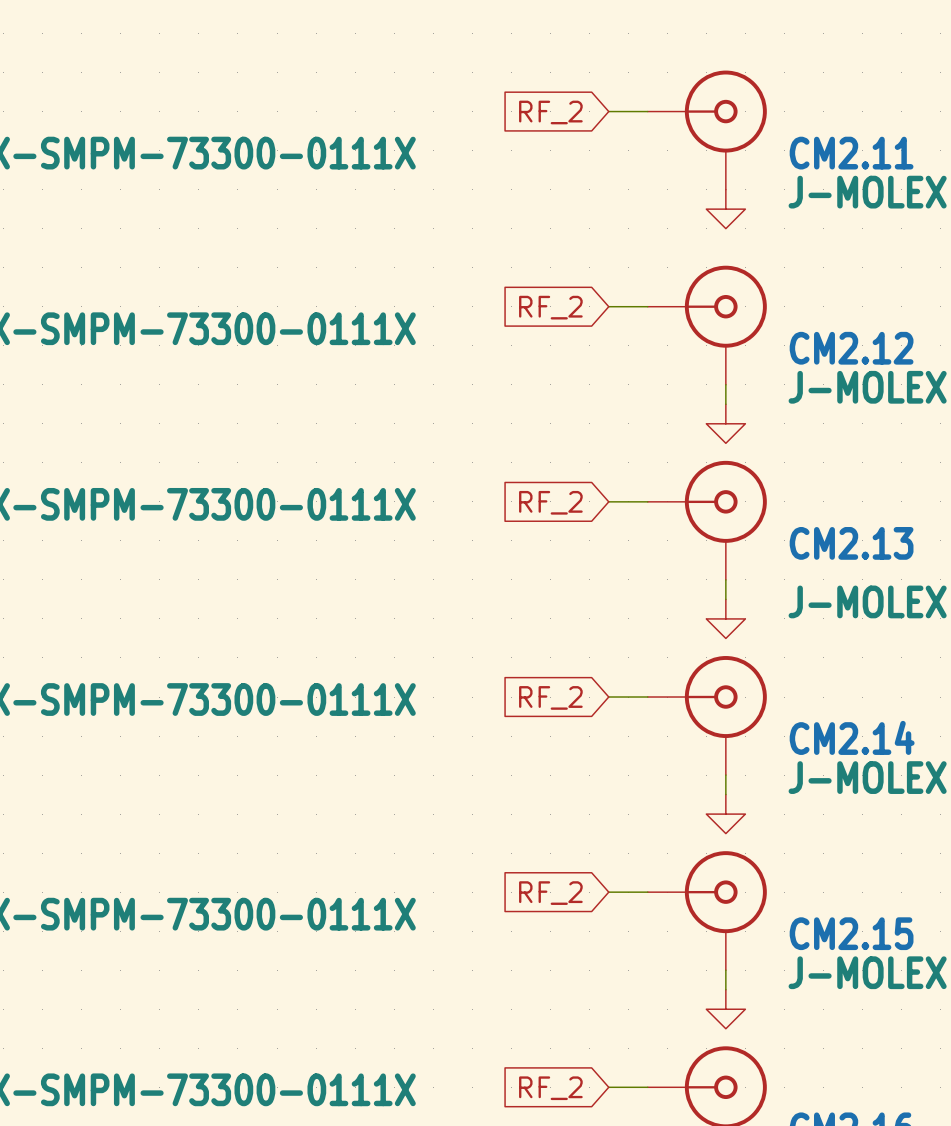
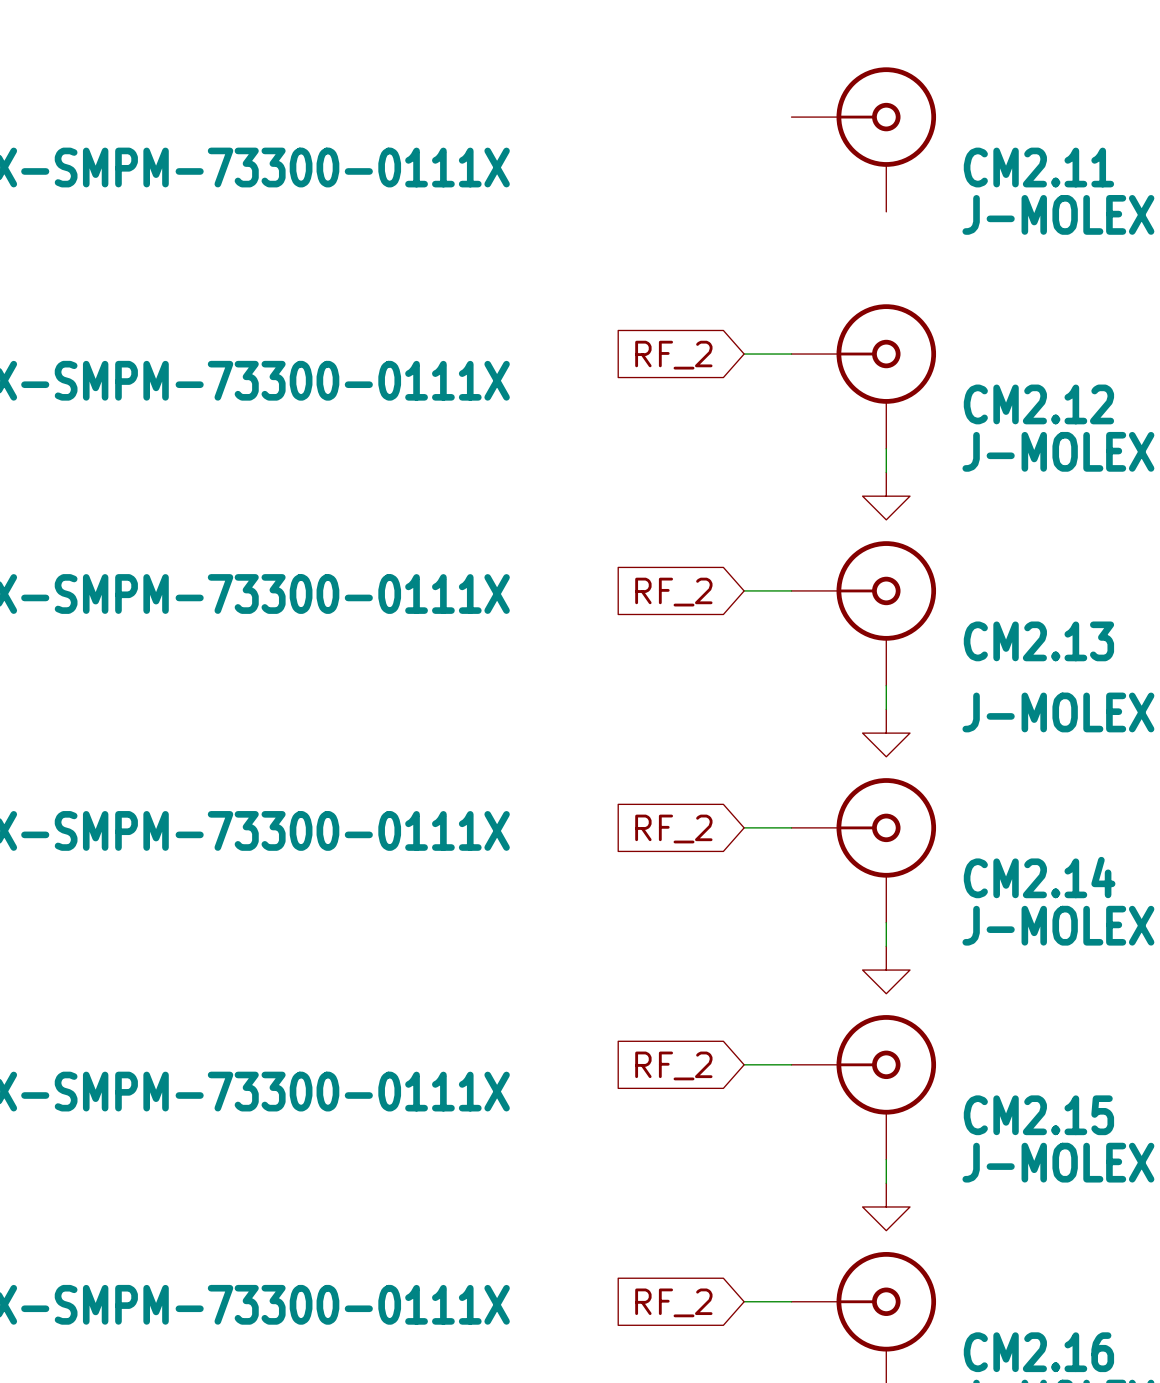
wire: (608, 111) (647, 111) -> none
global label: RF_2 (550, 112) -> none
power symbol: (725, 209) -> none

